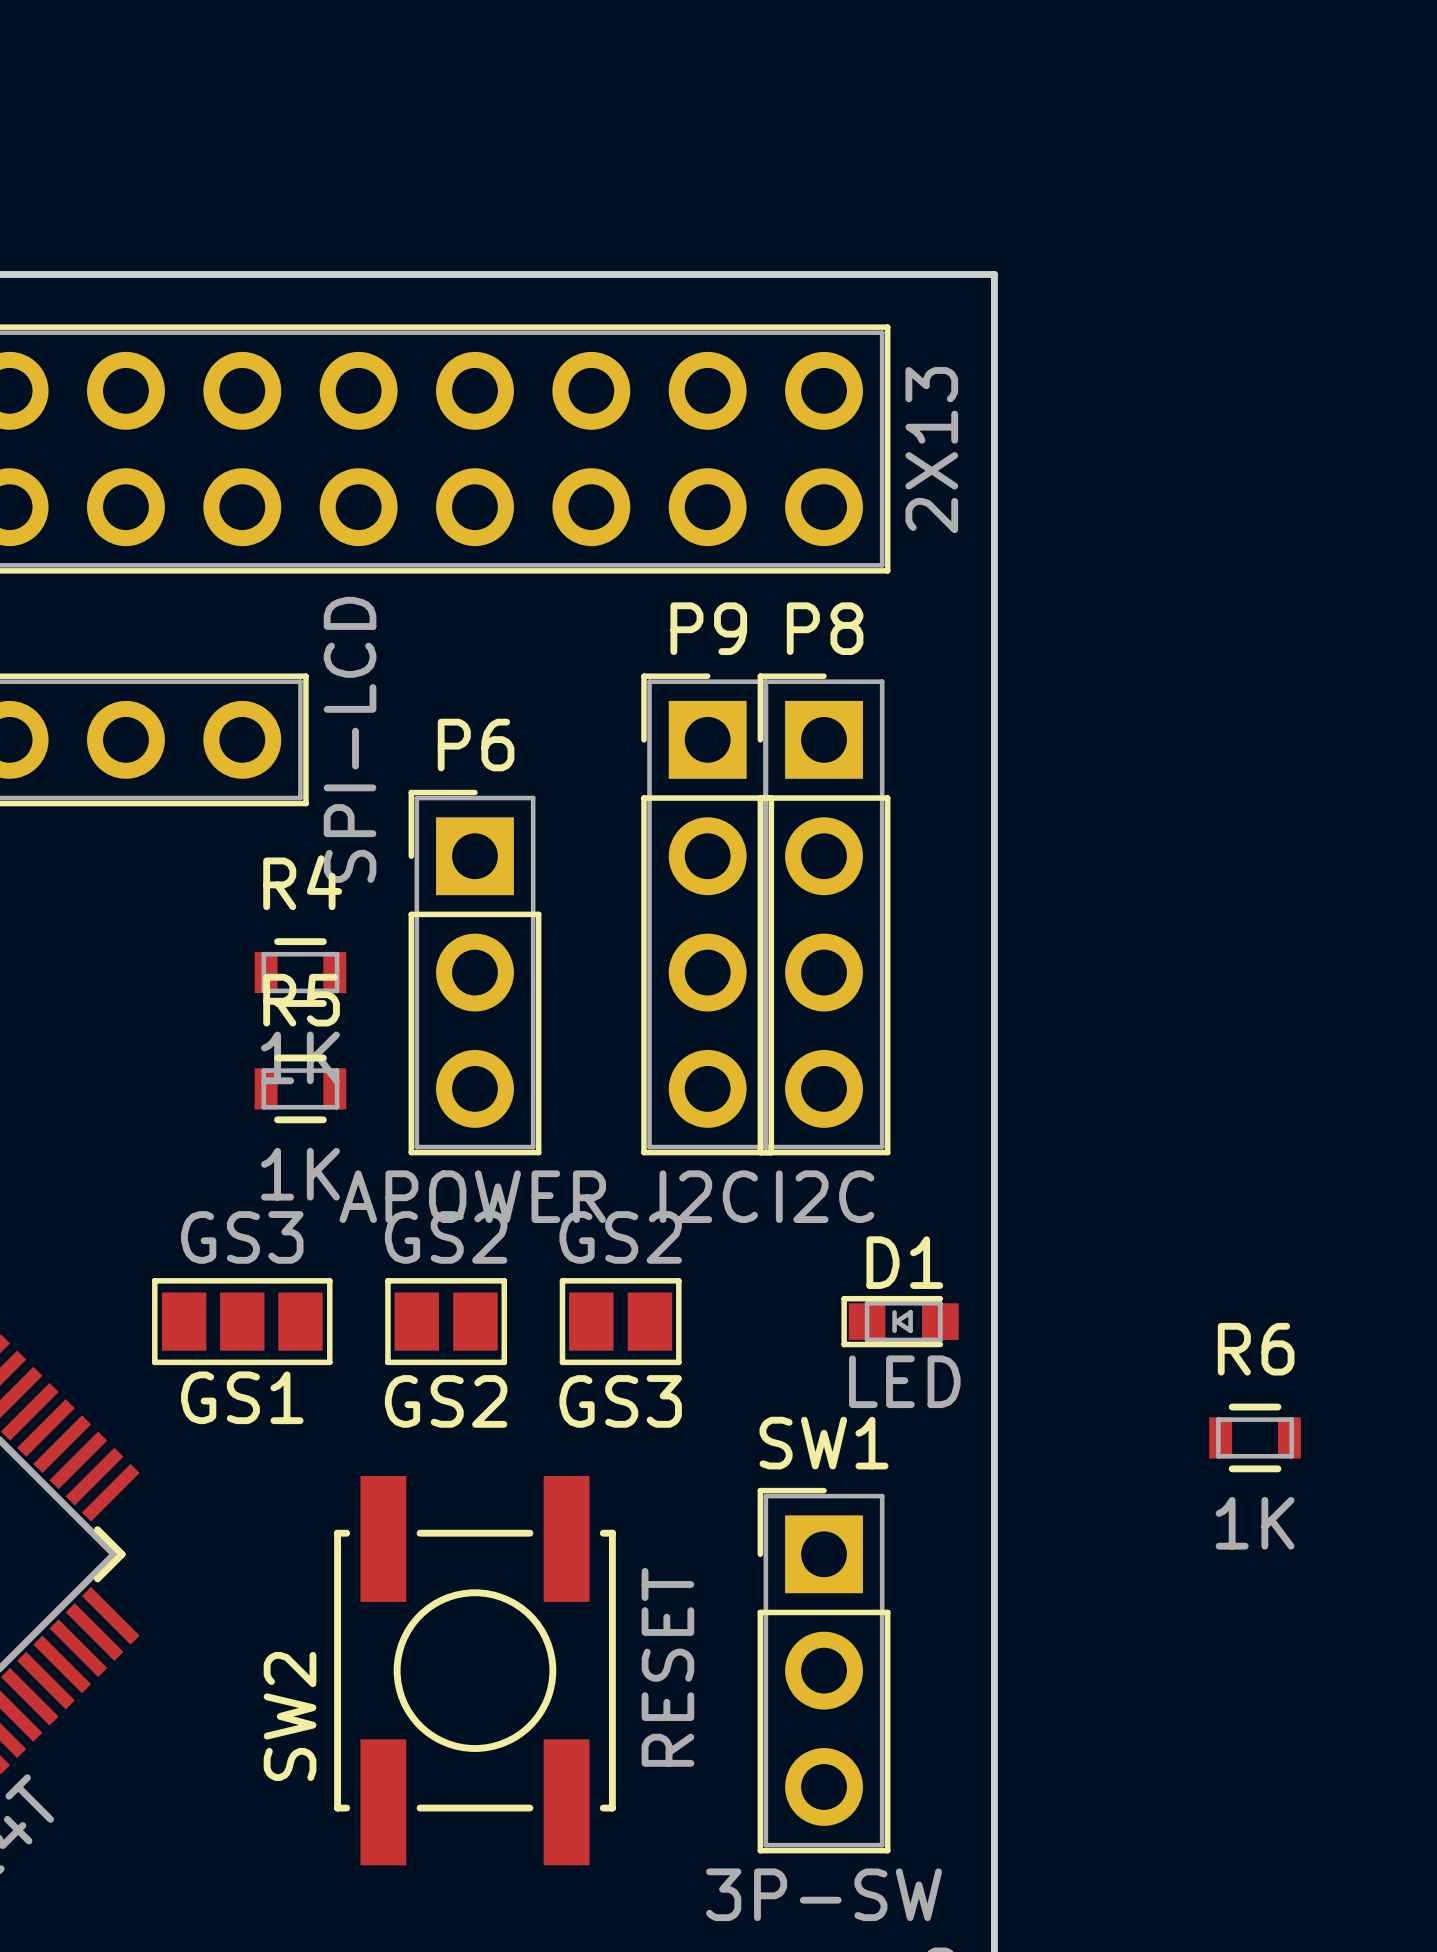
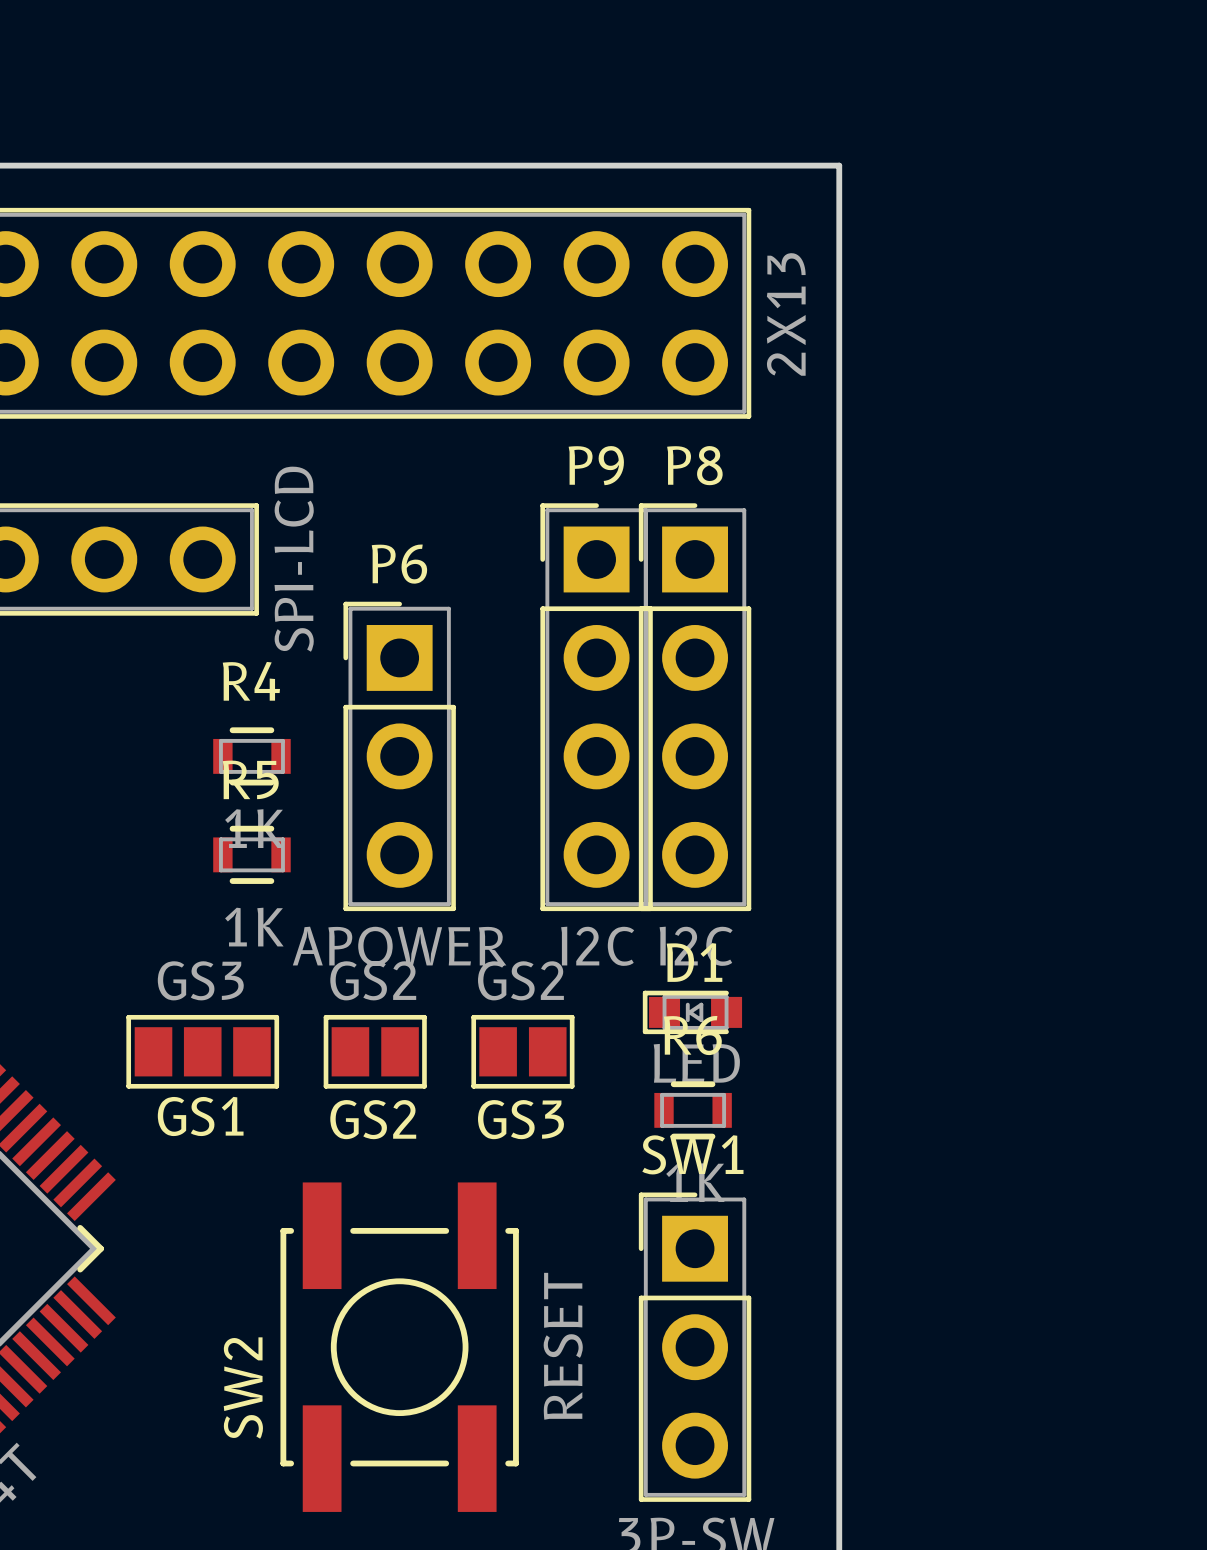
D1 position: (900, 1321) -> (692, 1012)
R6 position: (1255, 1437) -> (693, 1110)

